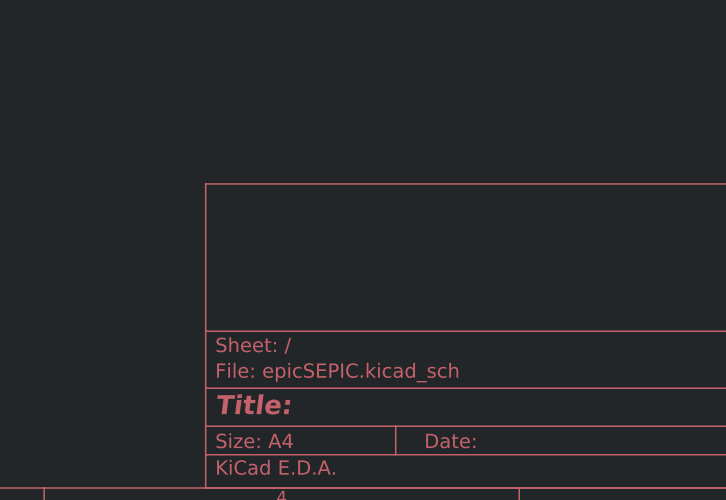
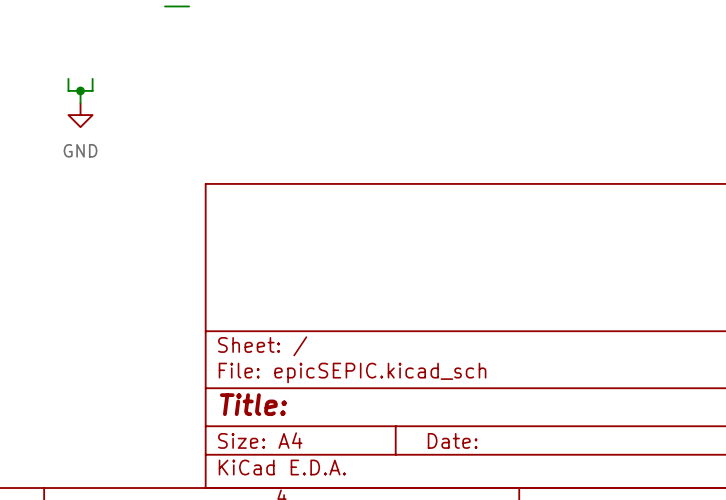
wire: none -> (165, 6) (189, 6)
wire: none -> (68, 78) (68, 90) (92, 90) (92, 78)
wire: none -> (80, 90) (80, 103)
junction: none -> (80, 90)
power symbol: none -> GND (80, 115)

